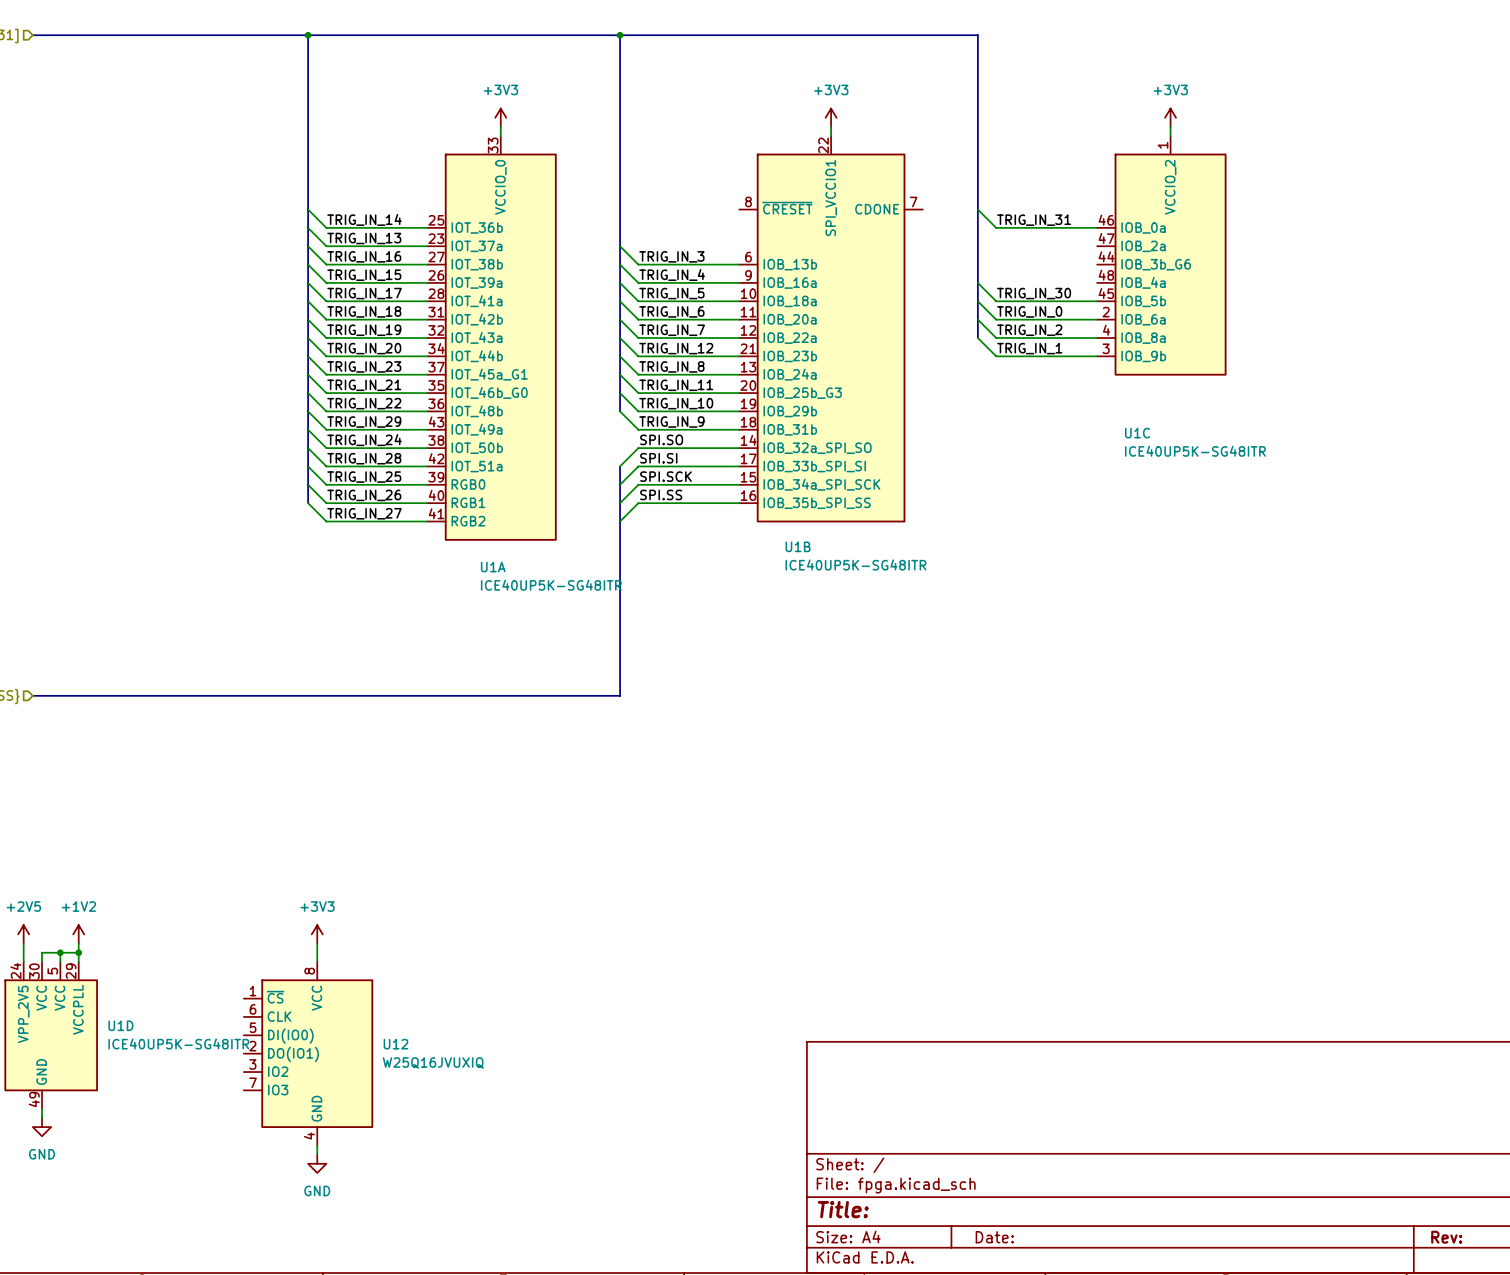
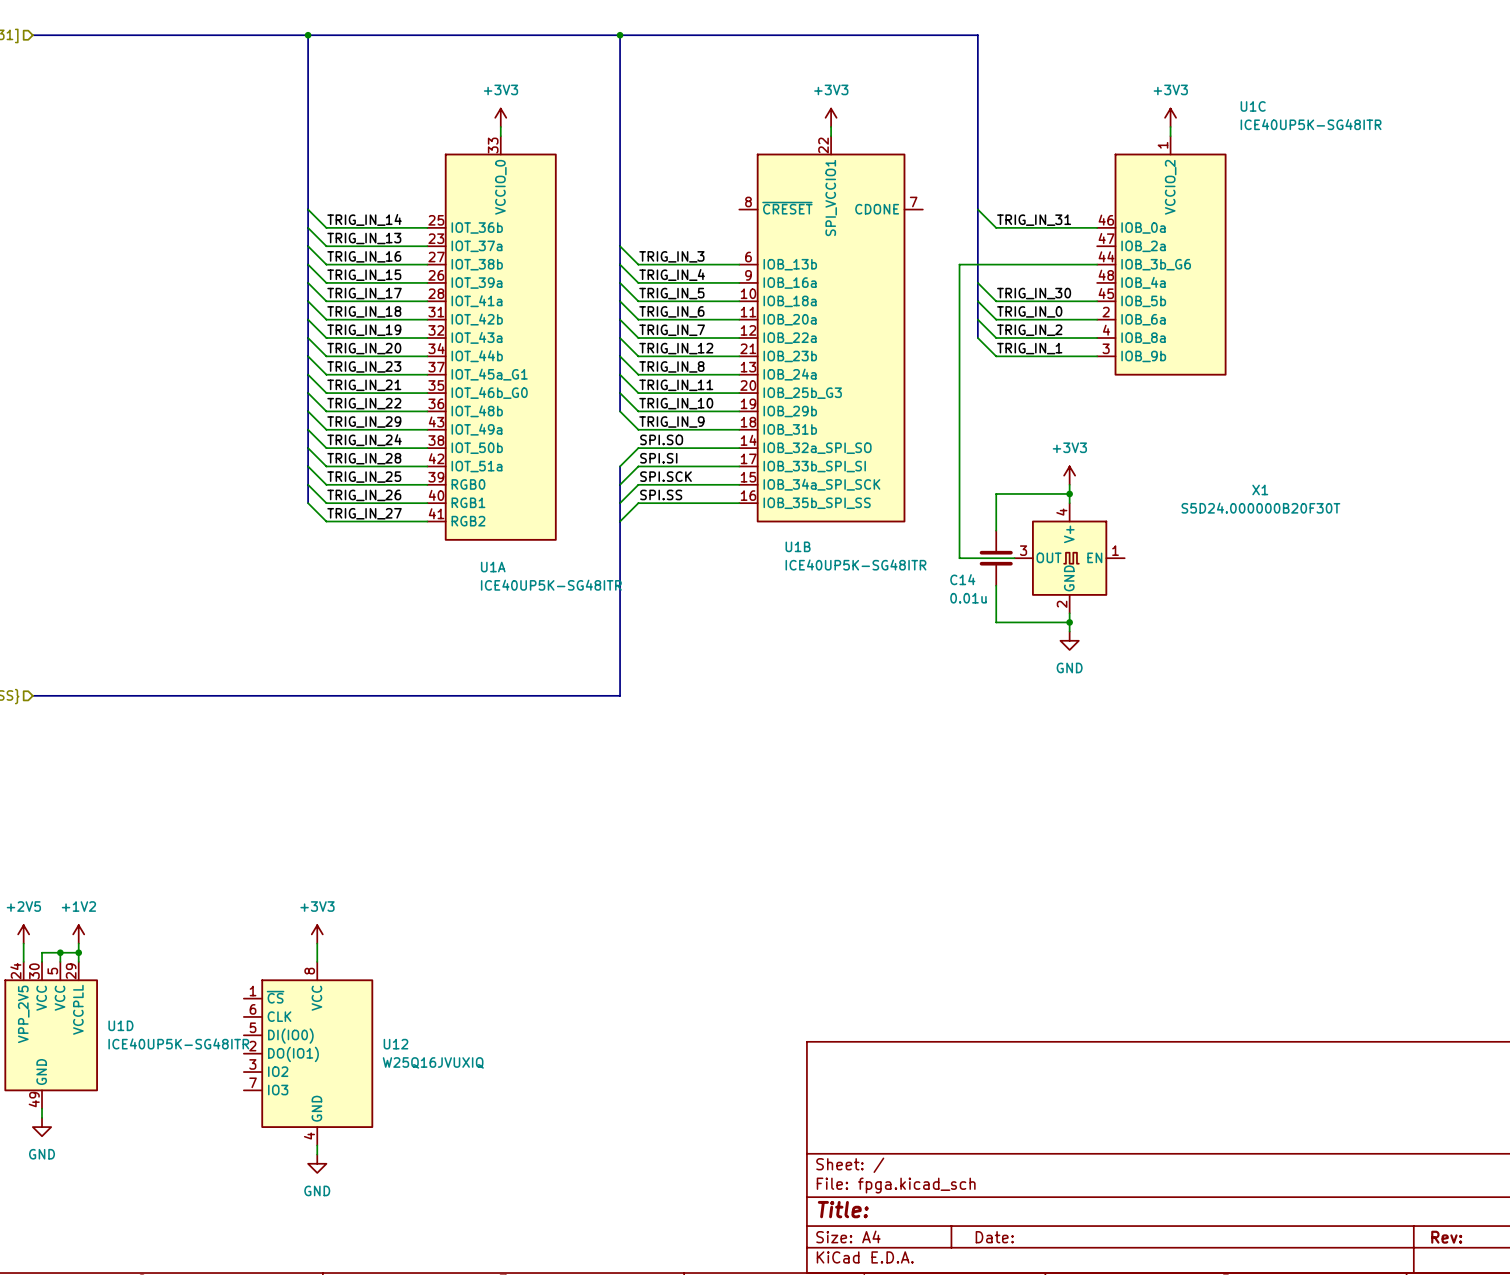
wire: none -> (1097, 264) (959, 264) (959, 558) (1014, 558)
U1C name position: U1C (1137, 433) -> U1C (1253, 106)
U1C value position: ICE40UP5K-SG48ITR (1195, 451) -> ICE40UP5K-SG48ITR (1311, 124)
power symbol: none -> +3V3 (1069, 475)
wire: none -> (1069, 484) (1069, 503)
wire: none -> (1069, 493) (996, 493) (996, 530)
junction: none -> (1069, 493)
C14: none -> 0.01u (996, 558)
X1: none -> S5D24.000000B20F30T (1069, 558)
wire: none -> (996, 585) (996, 622) (1069, 622)
wire: none -> (1069, 613) (1069, 631)
junction: none -> (1069, 622)
power symbol: none -> GND (1069, 640)

